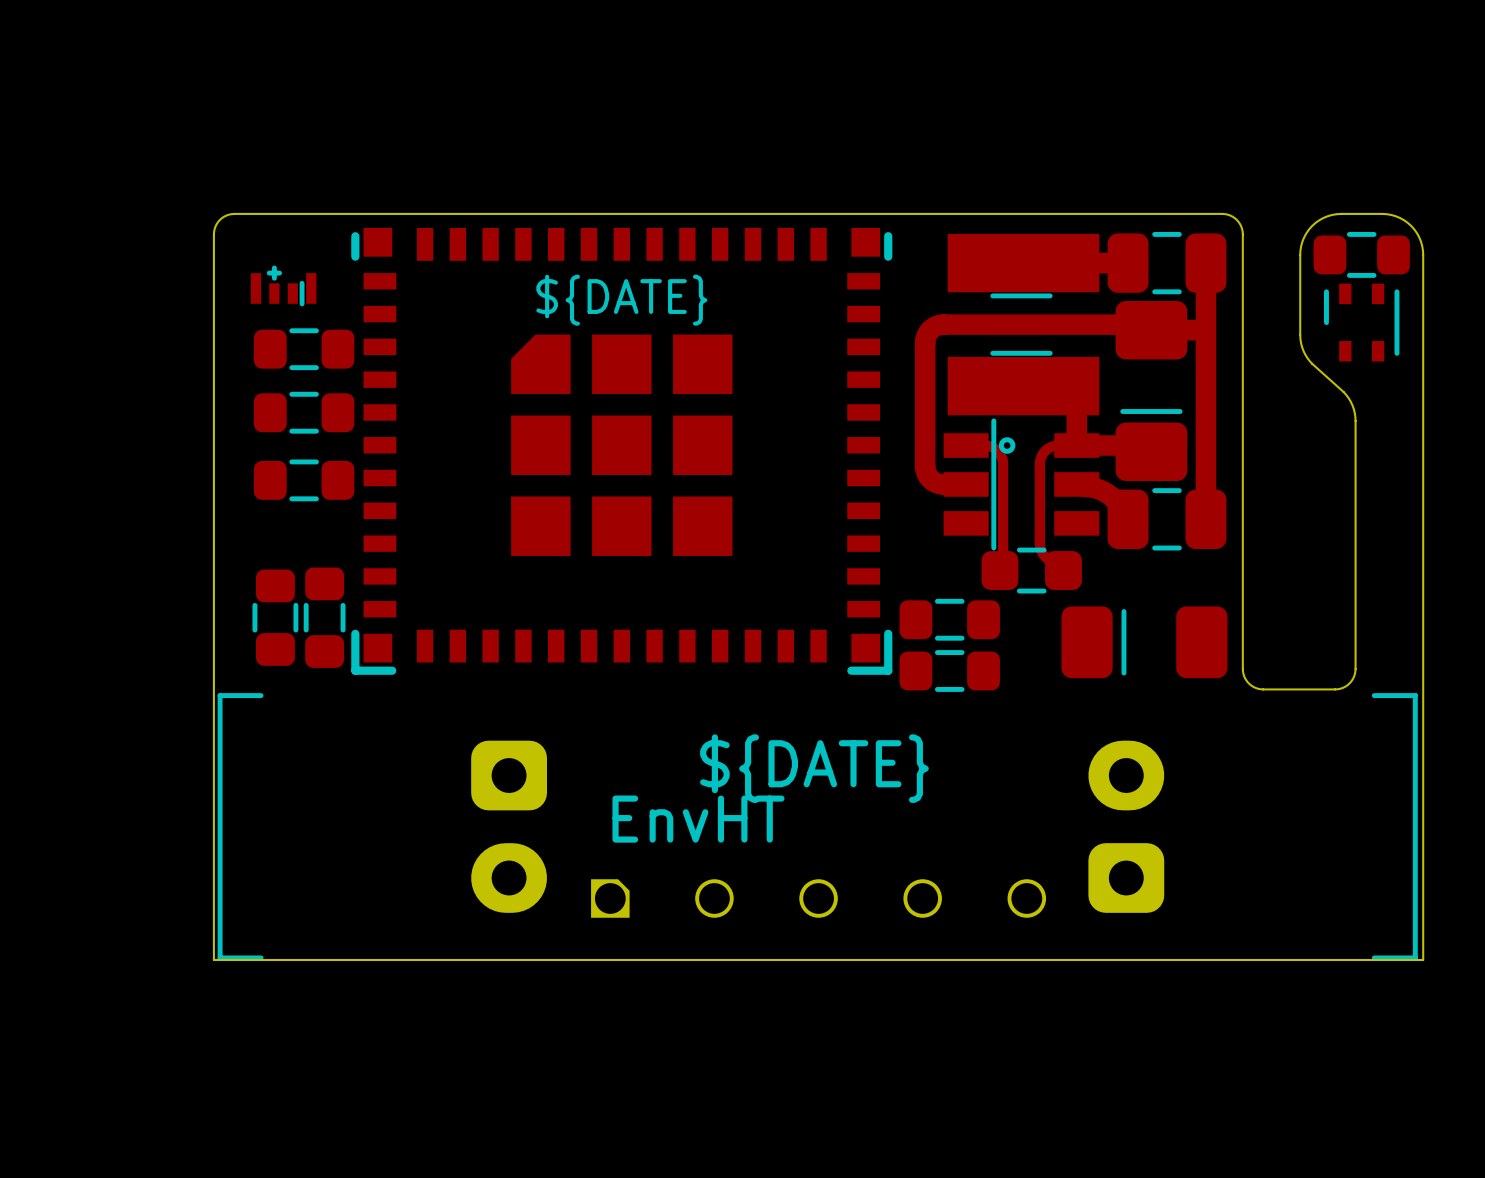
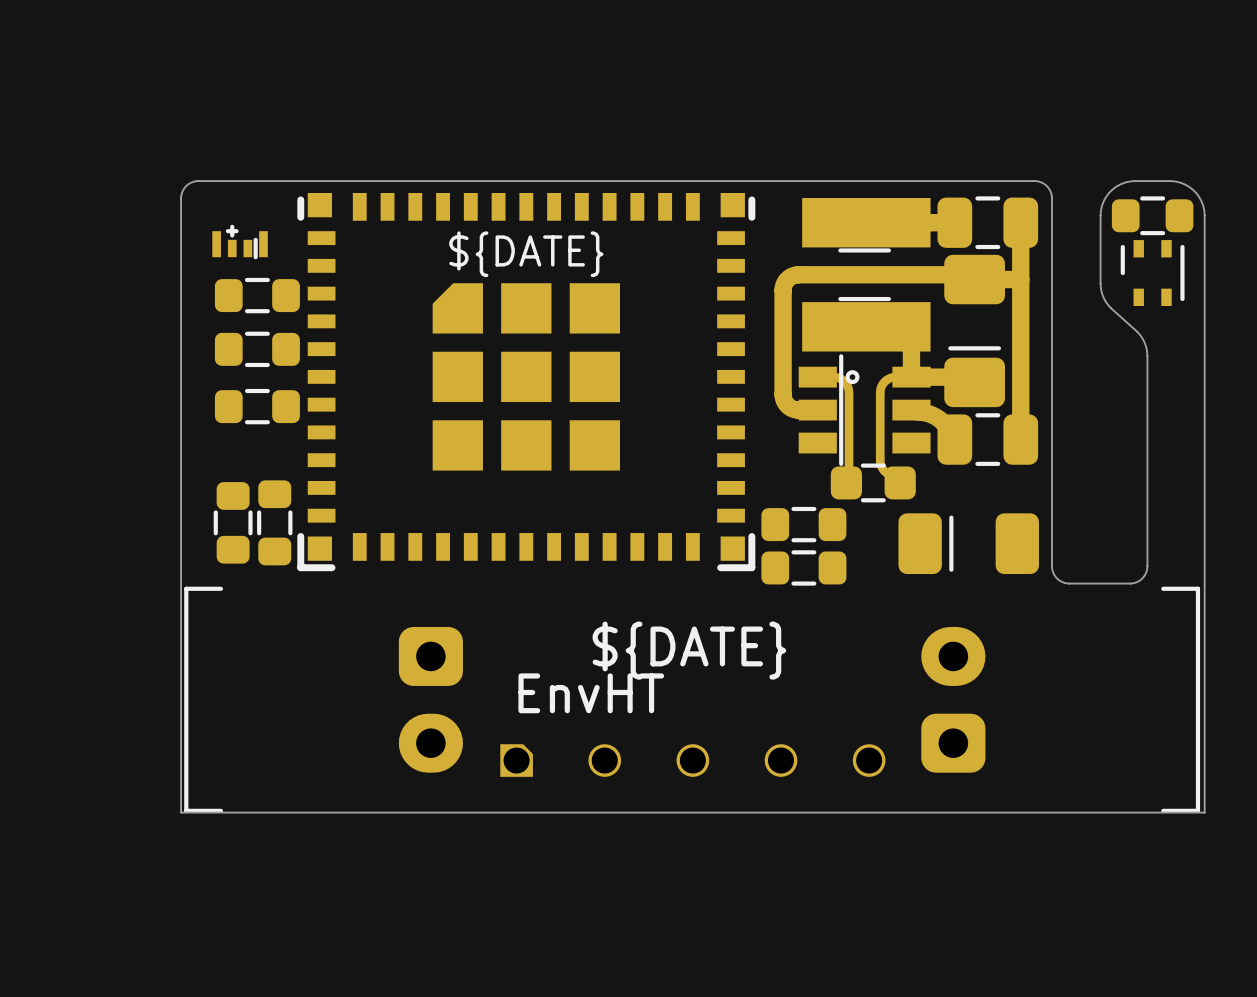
part footprint: [351, 228, 893, 675] -> [297, 192, 756, 572]

